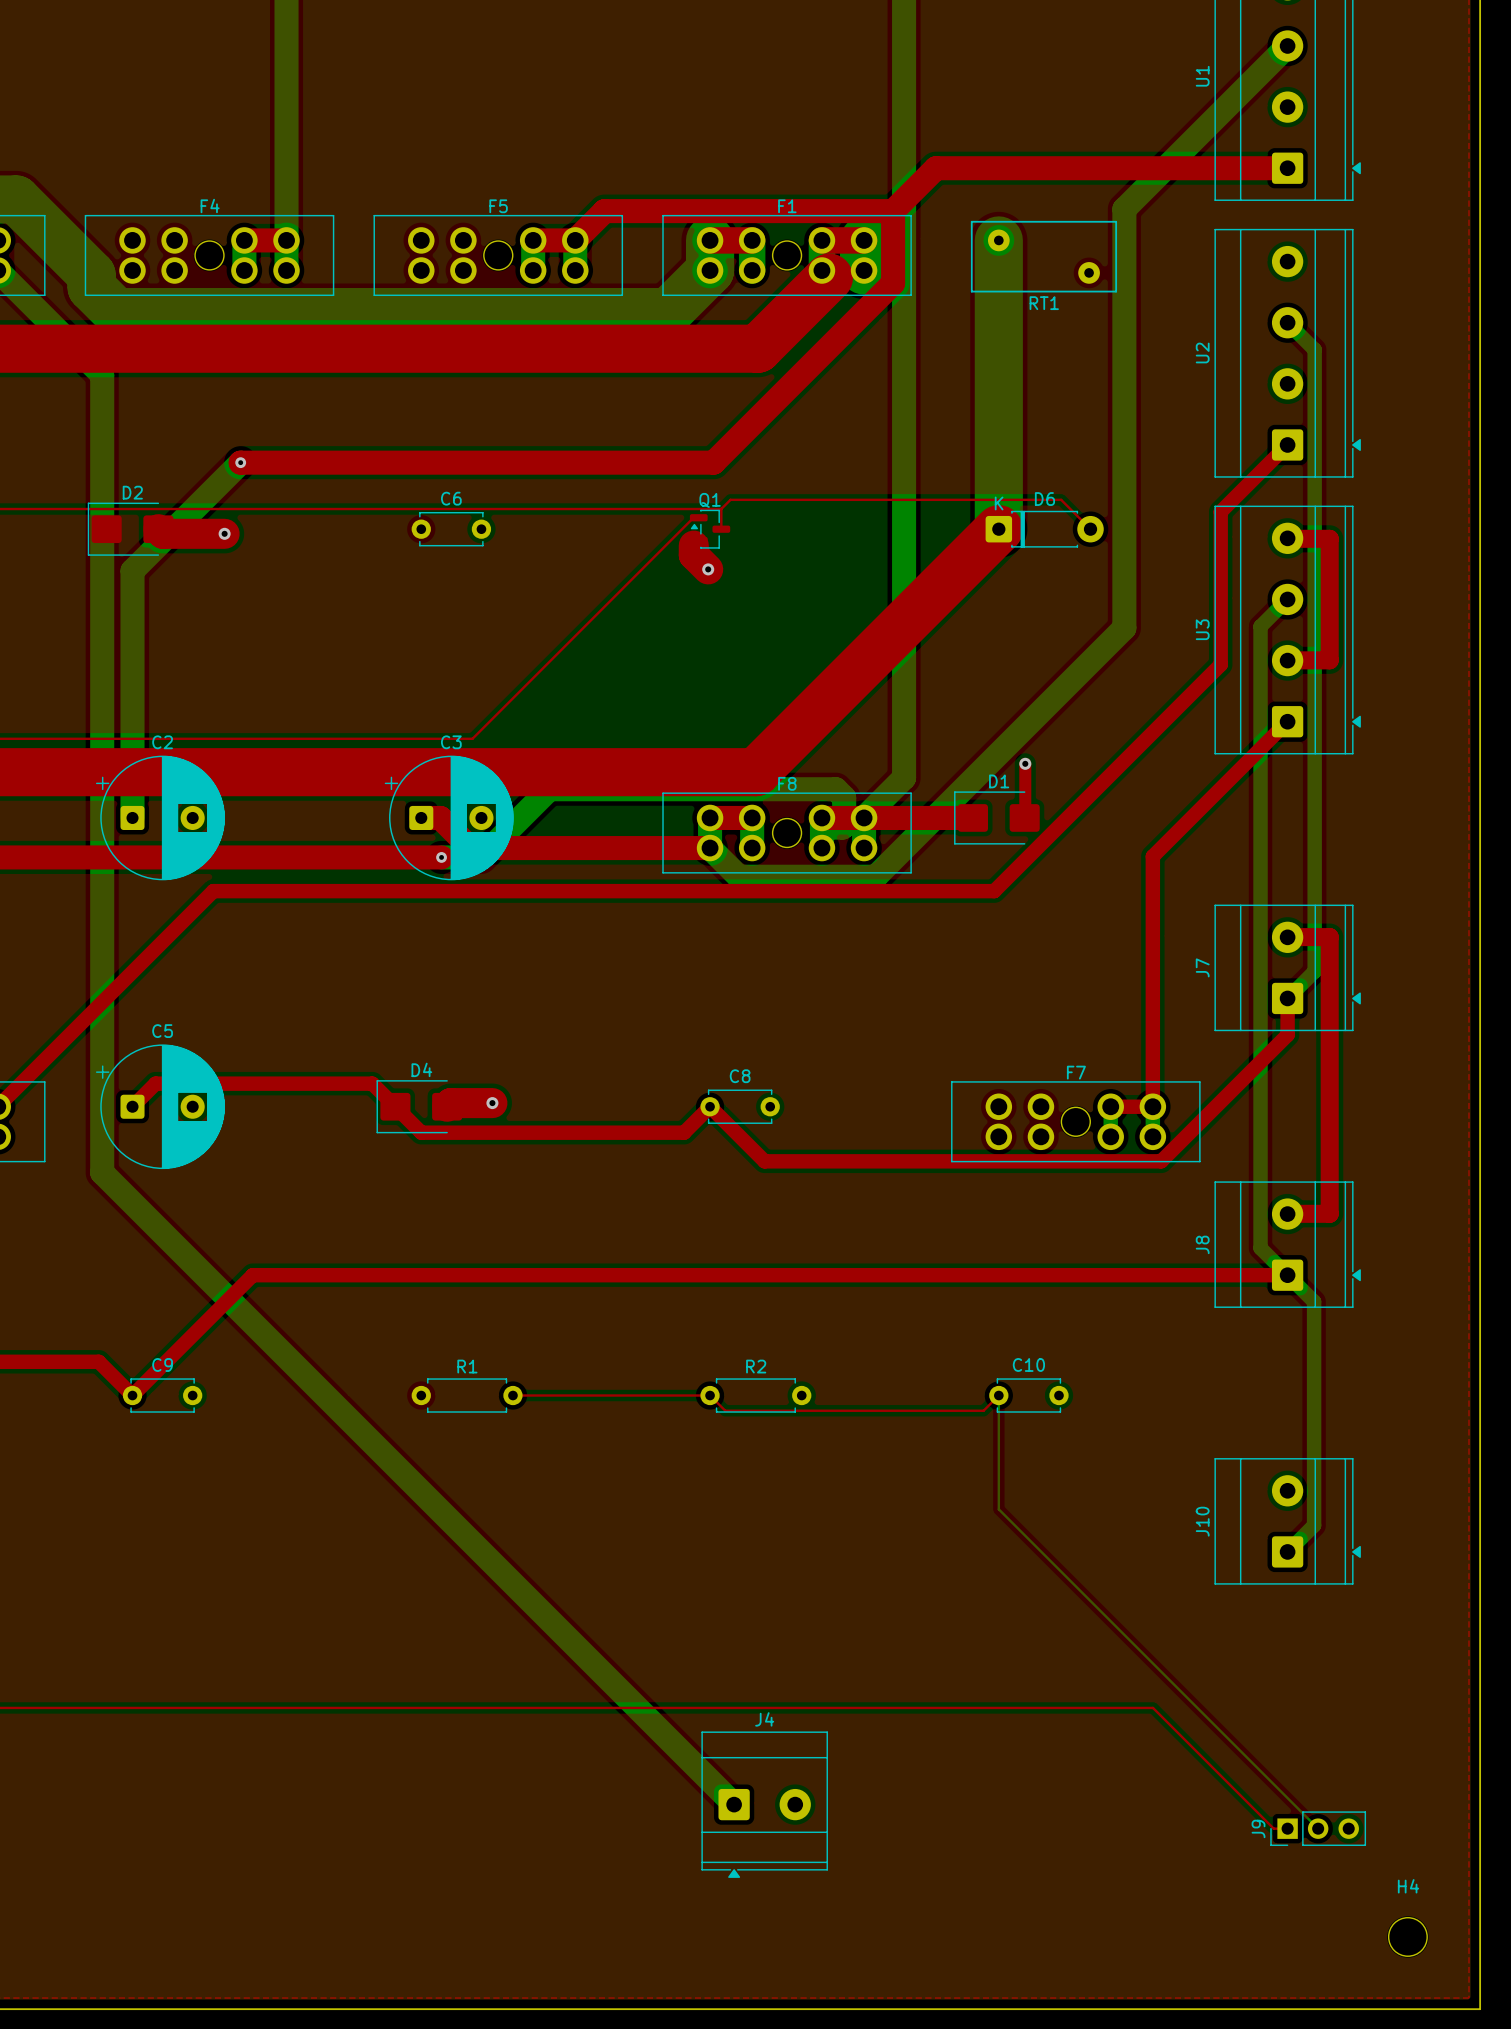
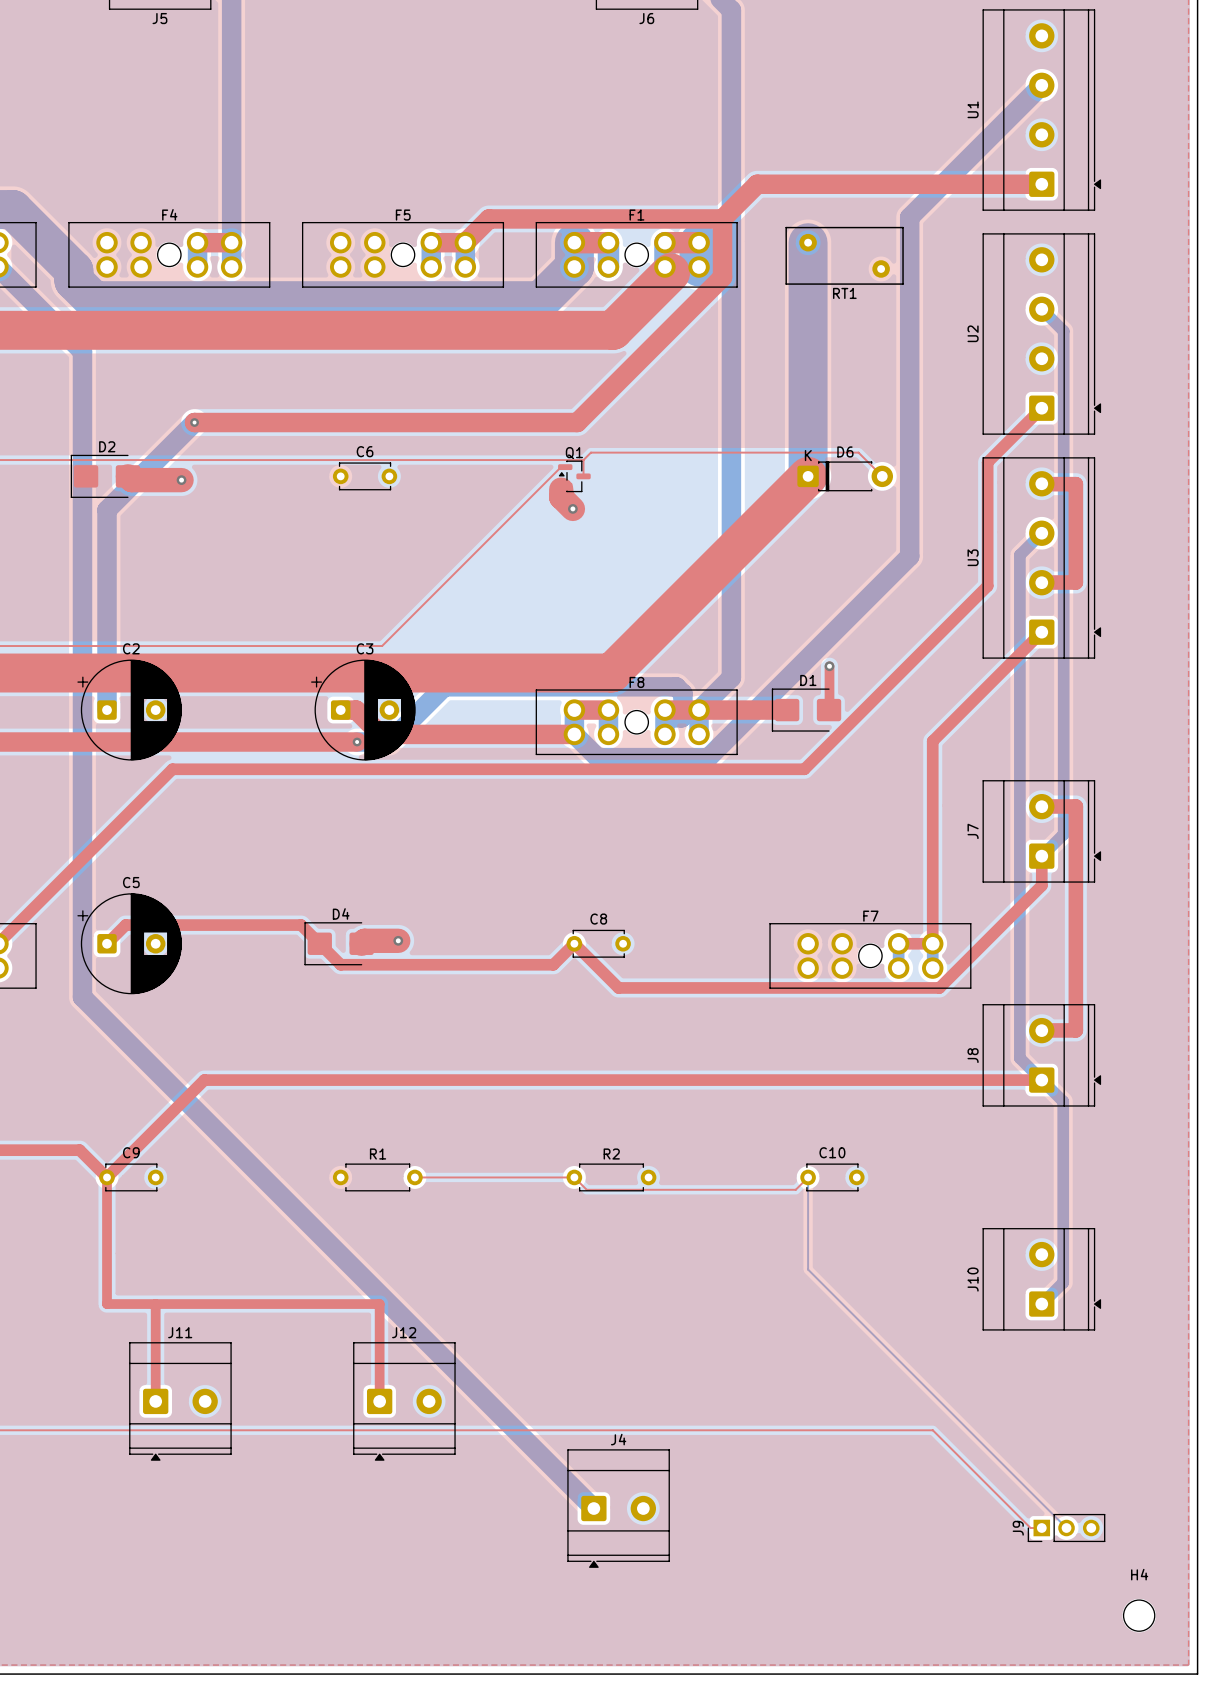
top track: none -> (107, 1177) (107, 1304) (379, 1304) (379, 1401)
top track: none -> (155, 1304) (155, 1401)
J11: none -> (180, 1401)
J12: none -> (404, 1401)

